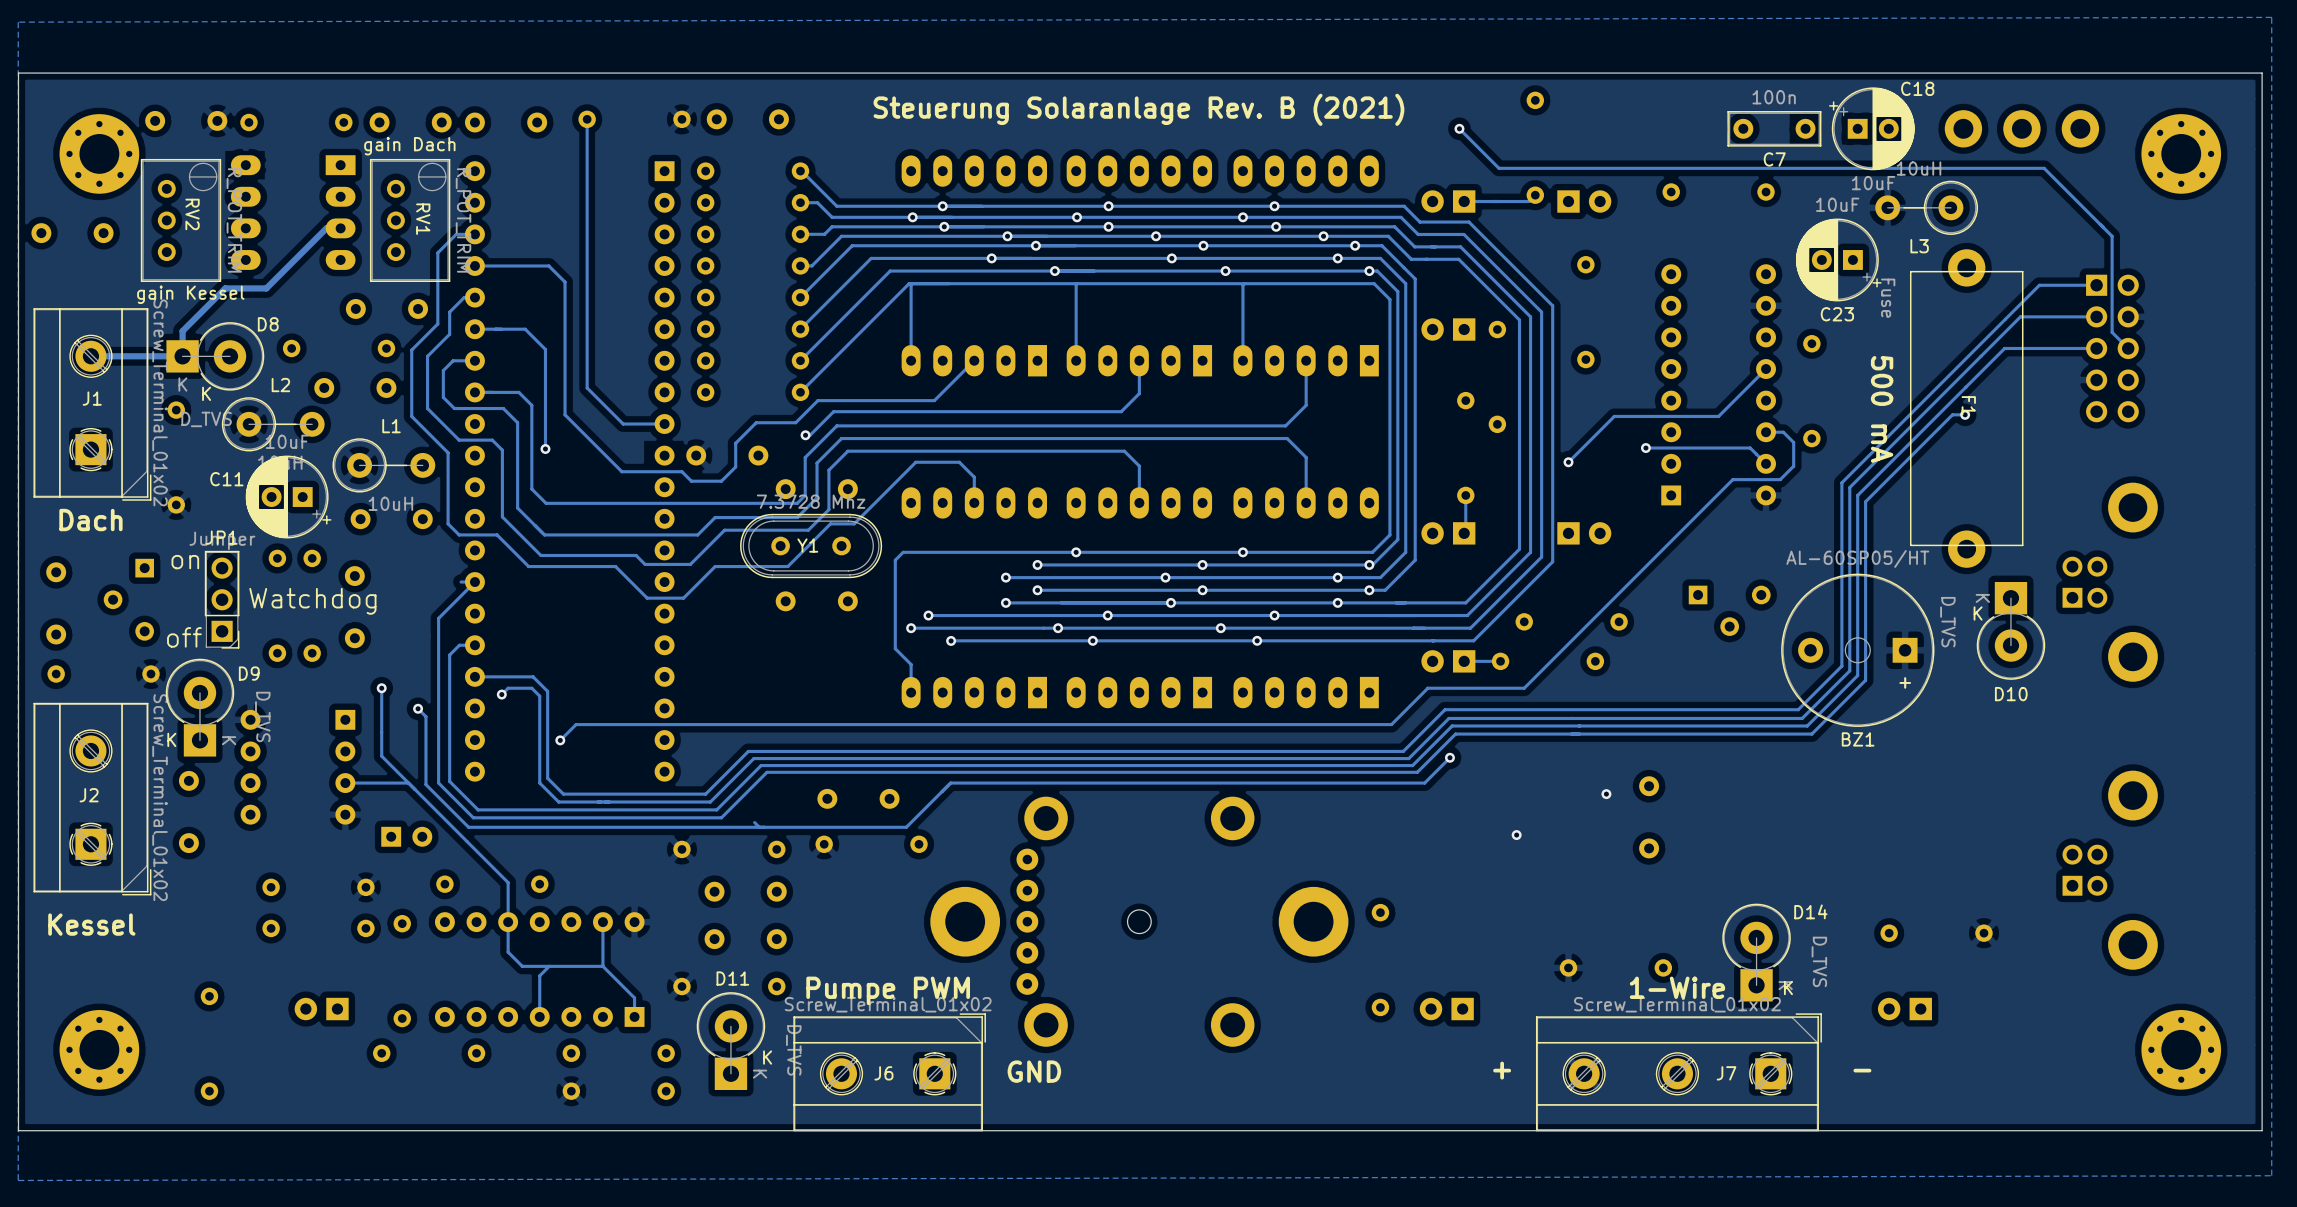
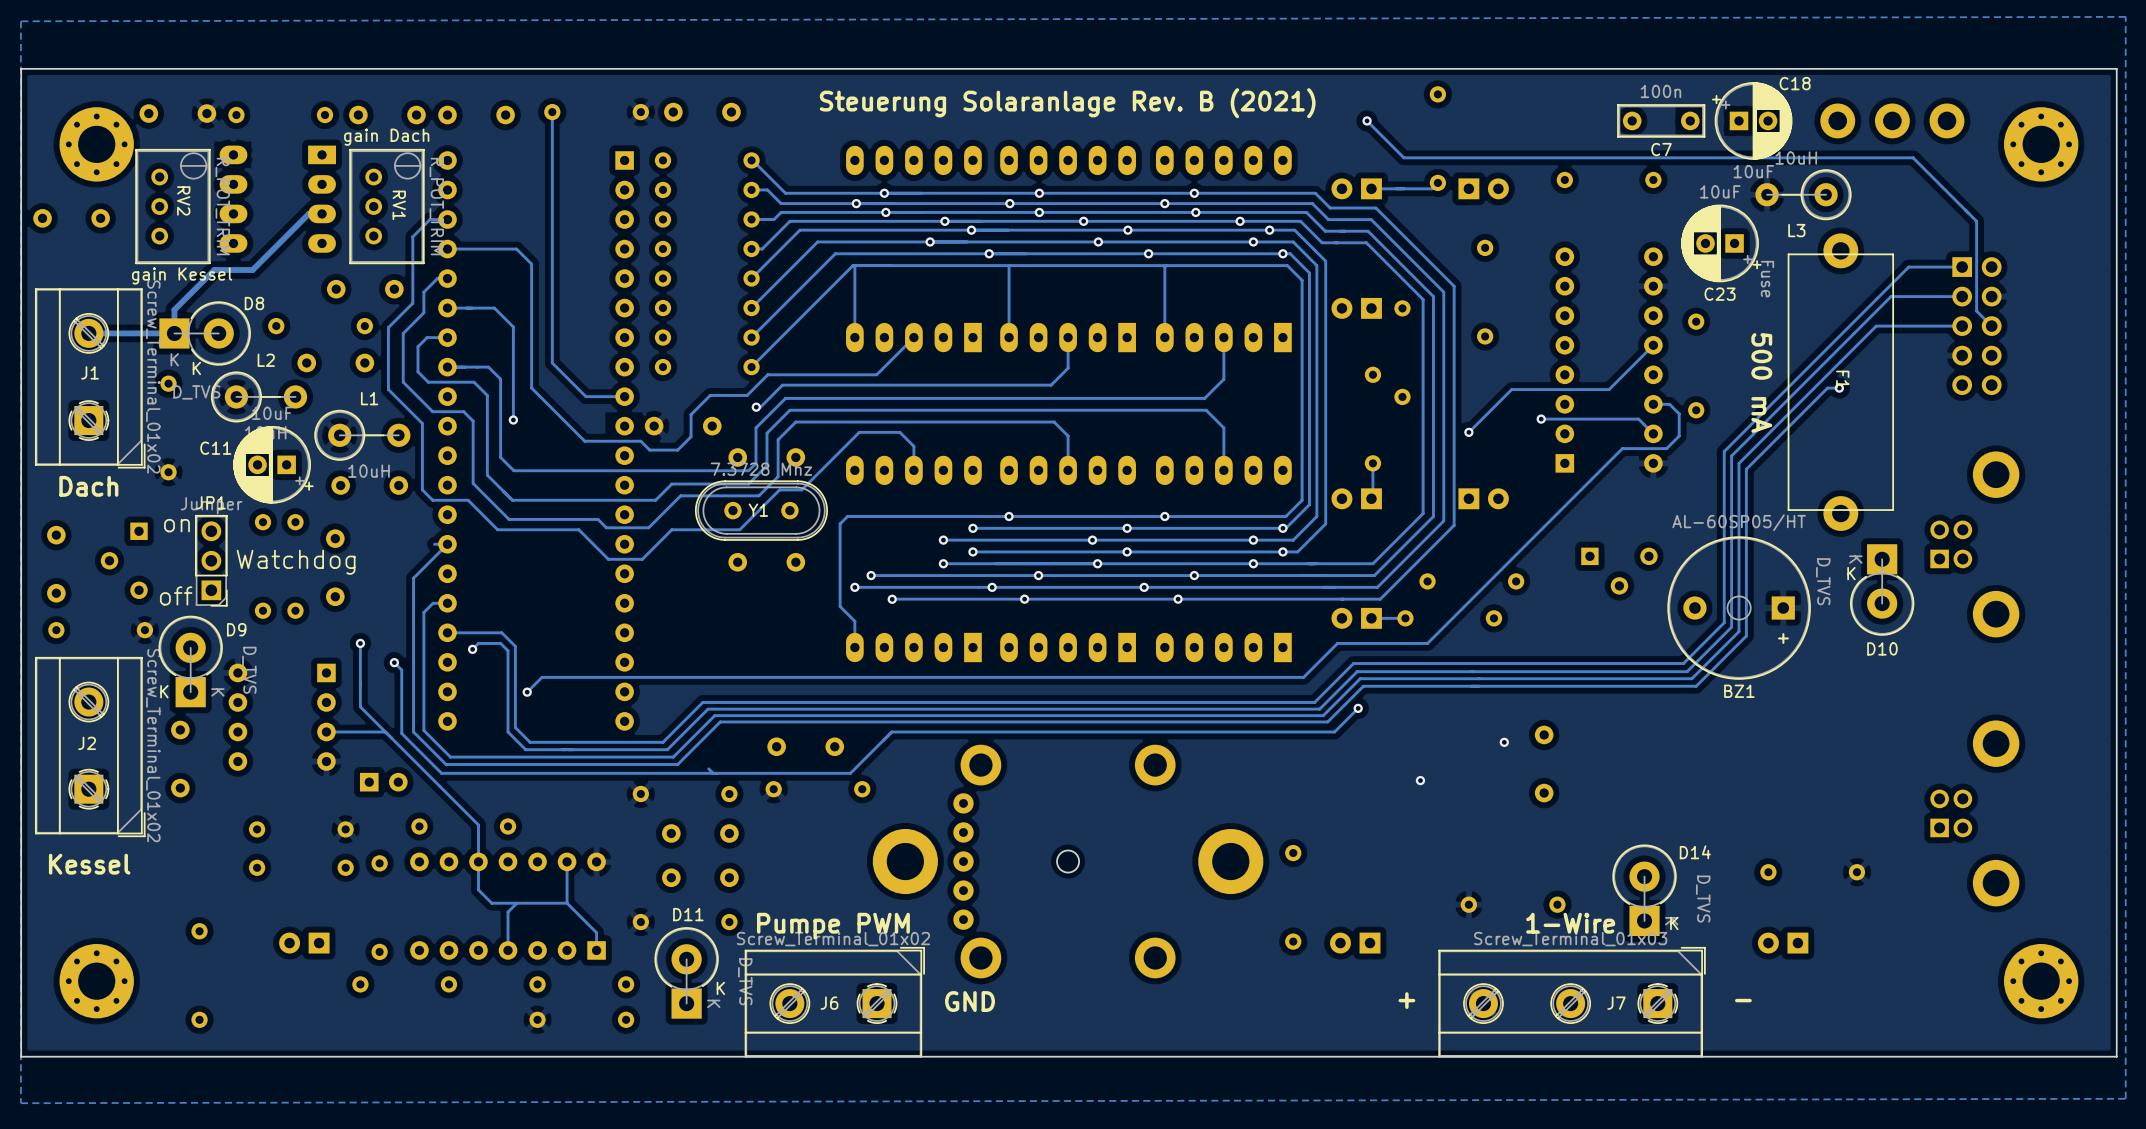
J7 value: Screw_Terminal_01x02 (1677, 1004) -> Screw_Terminal_01x03 (1570, 939)

